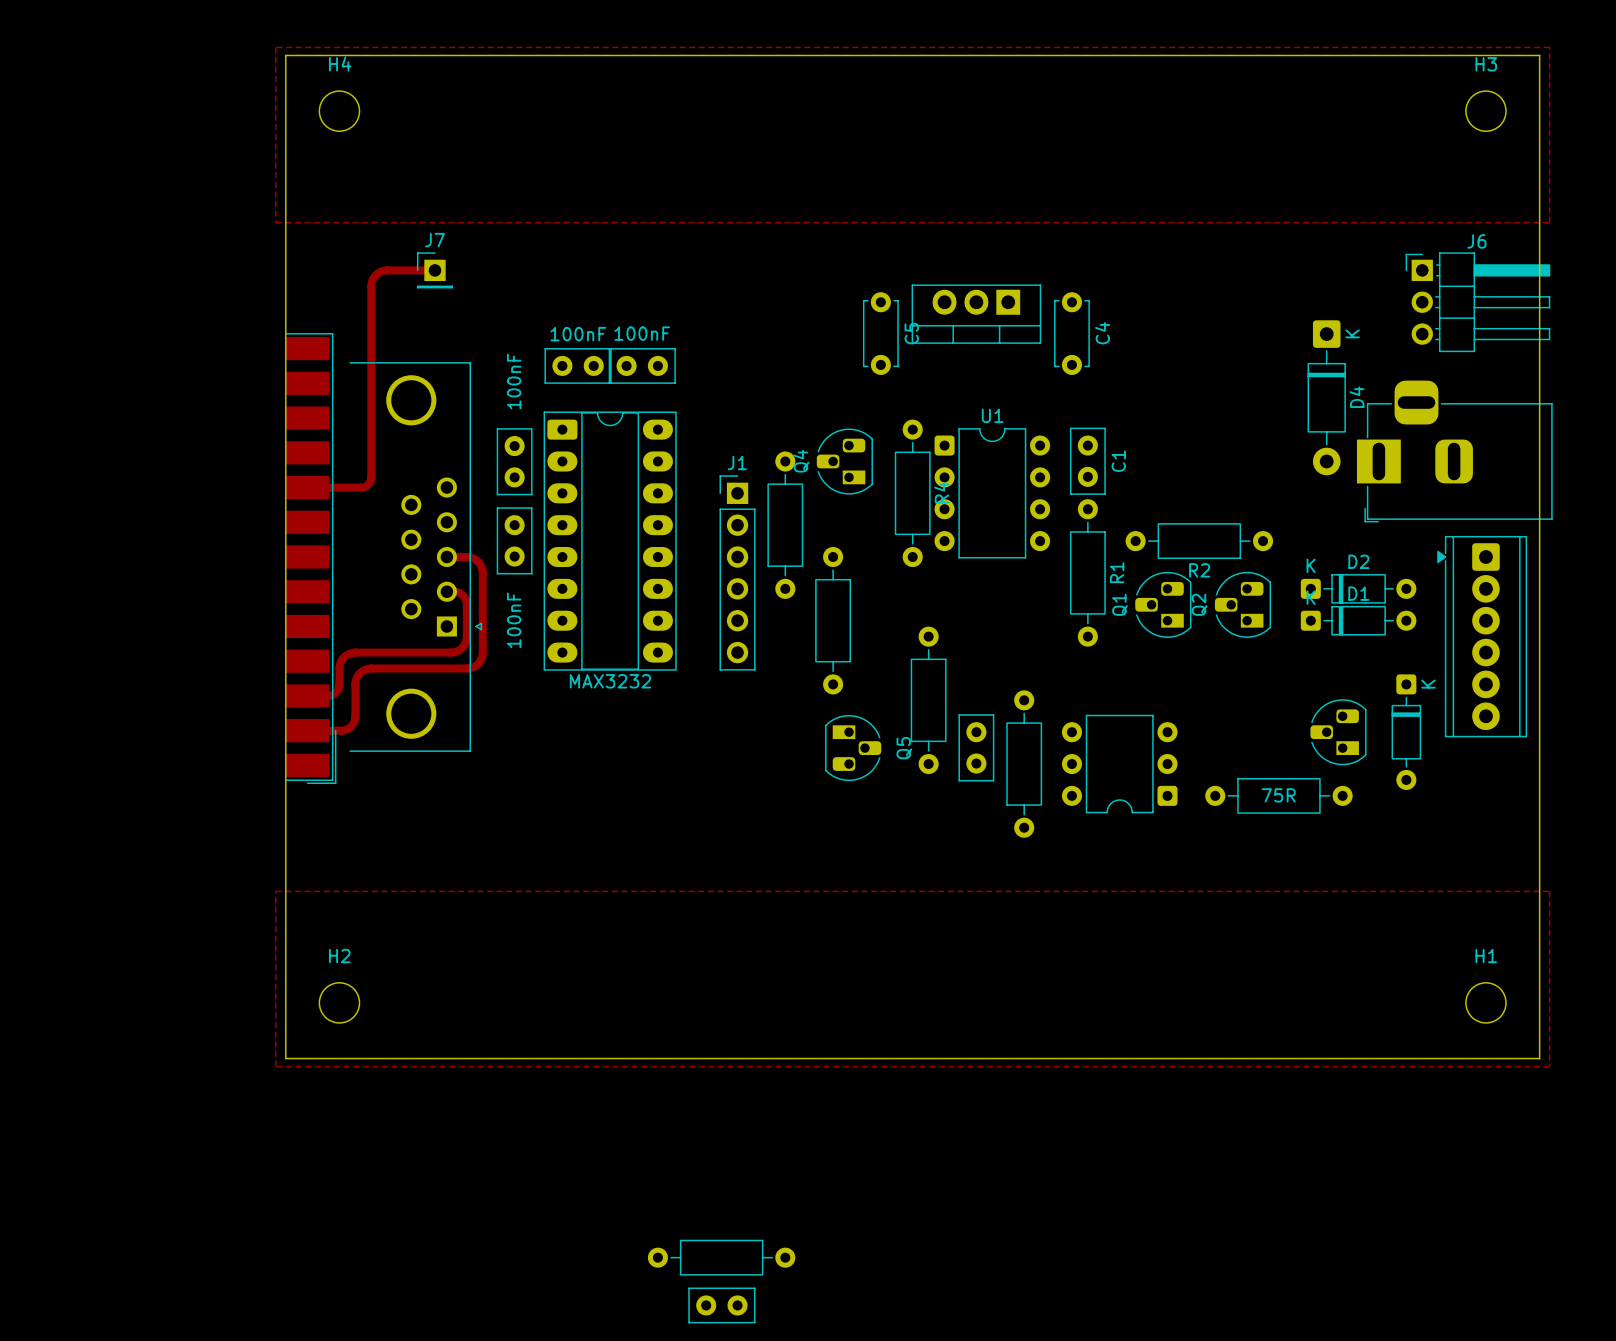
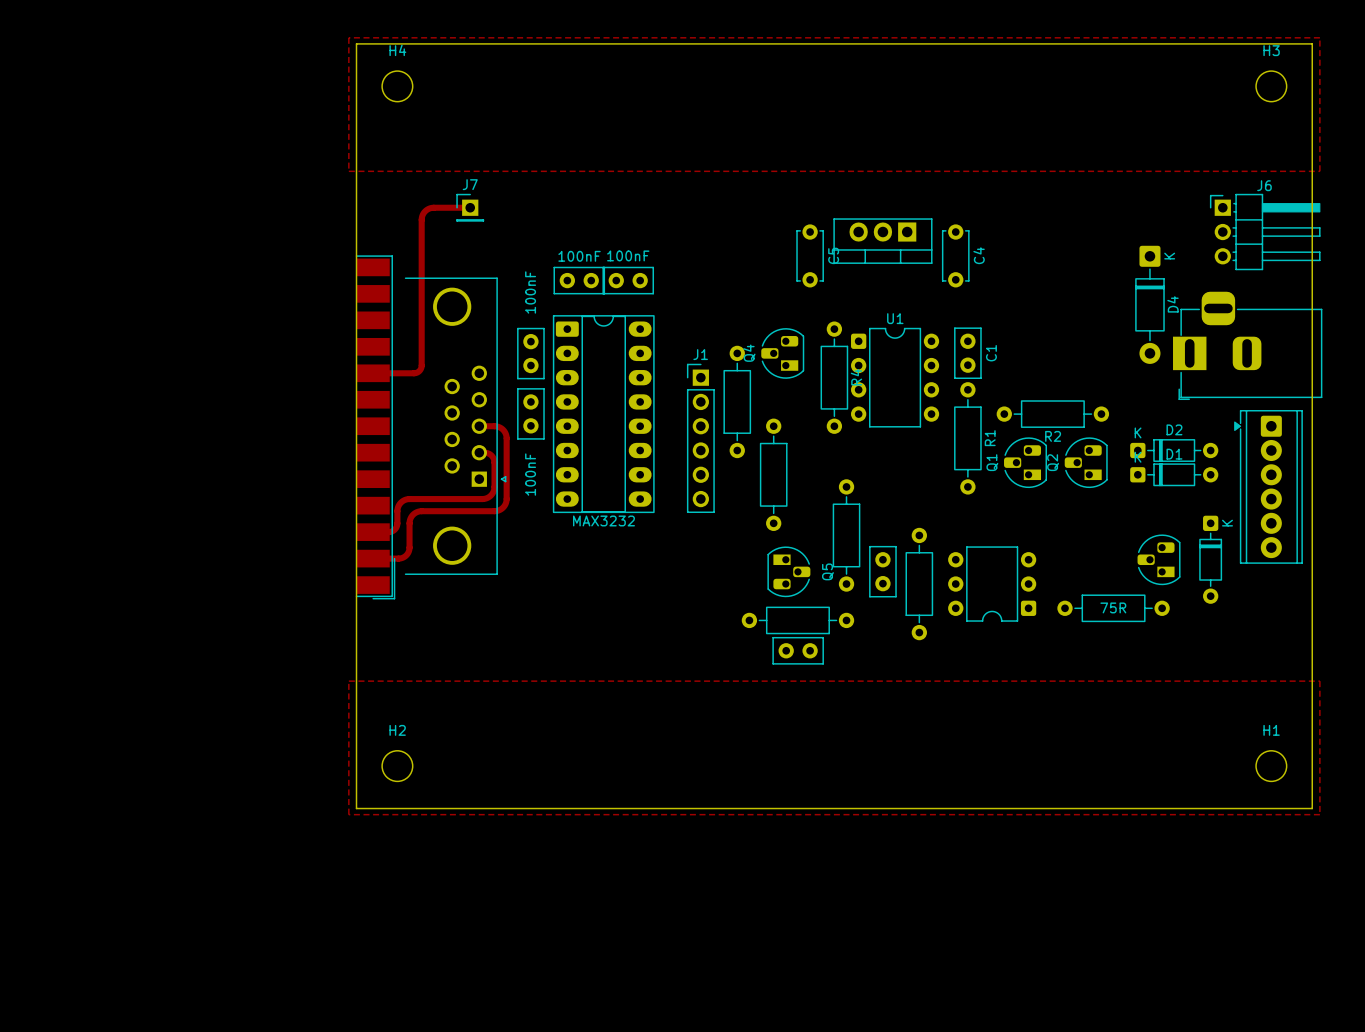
part: none -> (797, 620)
part: none -> (798, 650)
part: (721, 1257) -> none
part: (721, 1305) -> none

